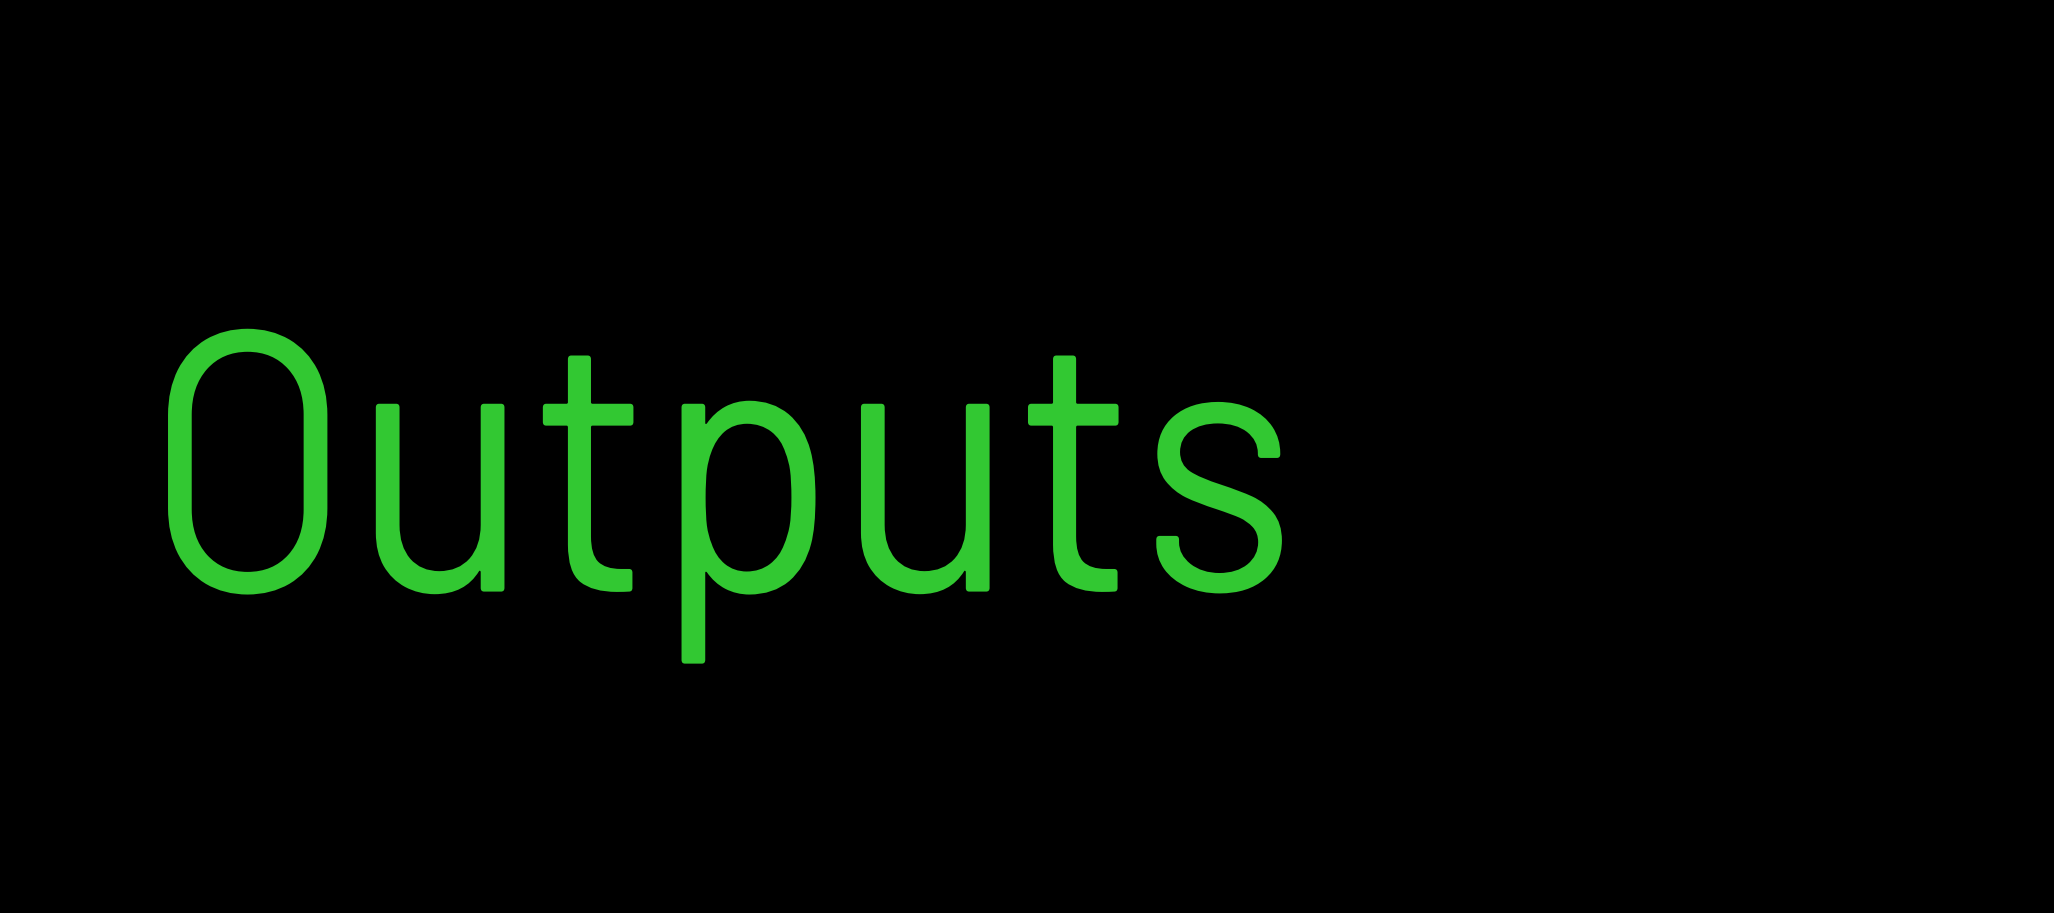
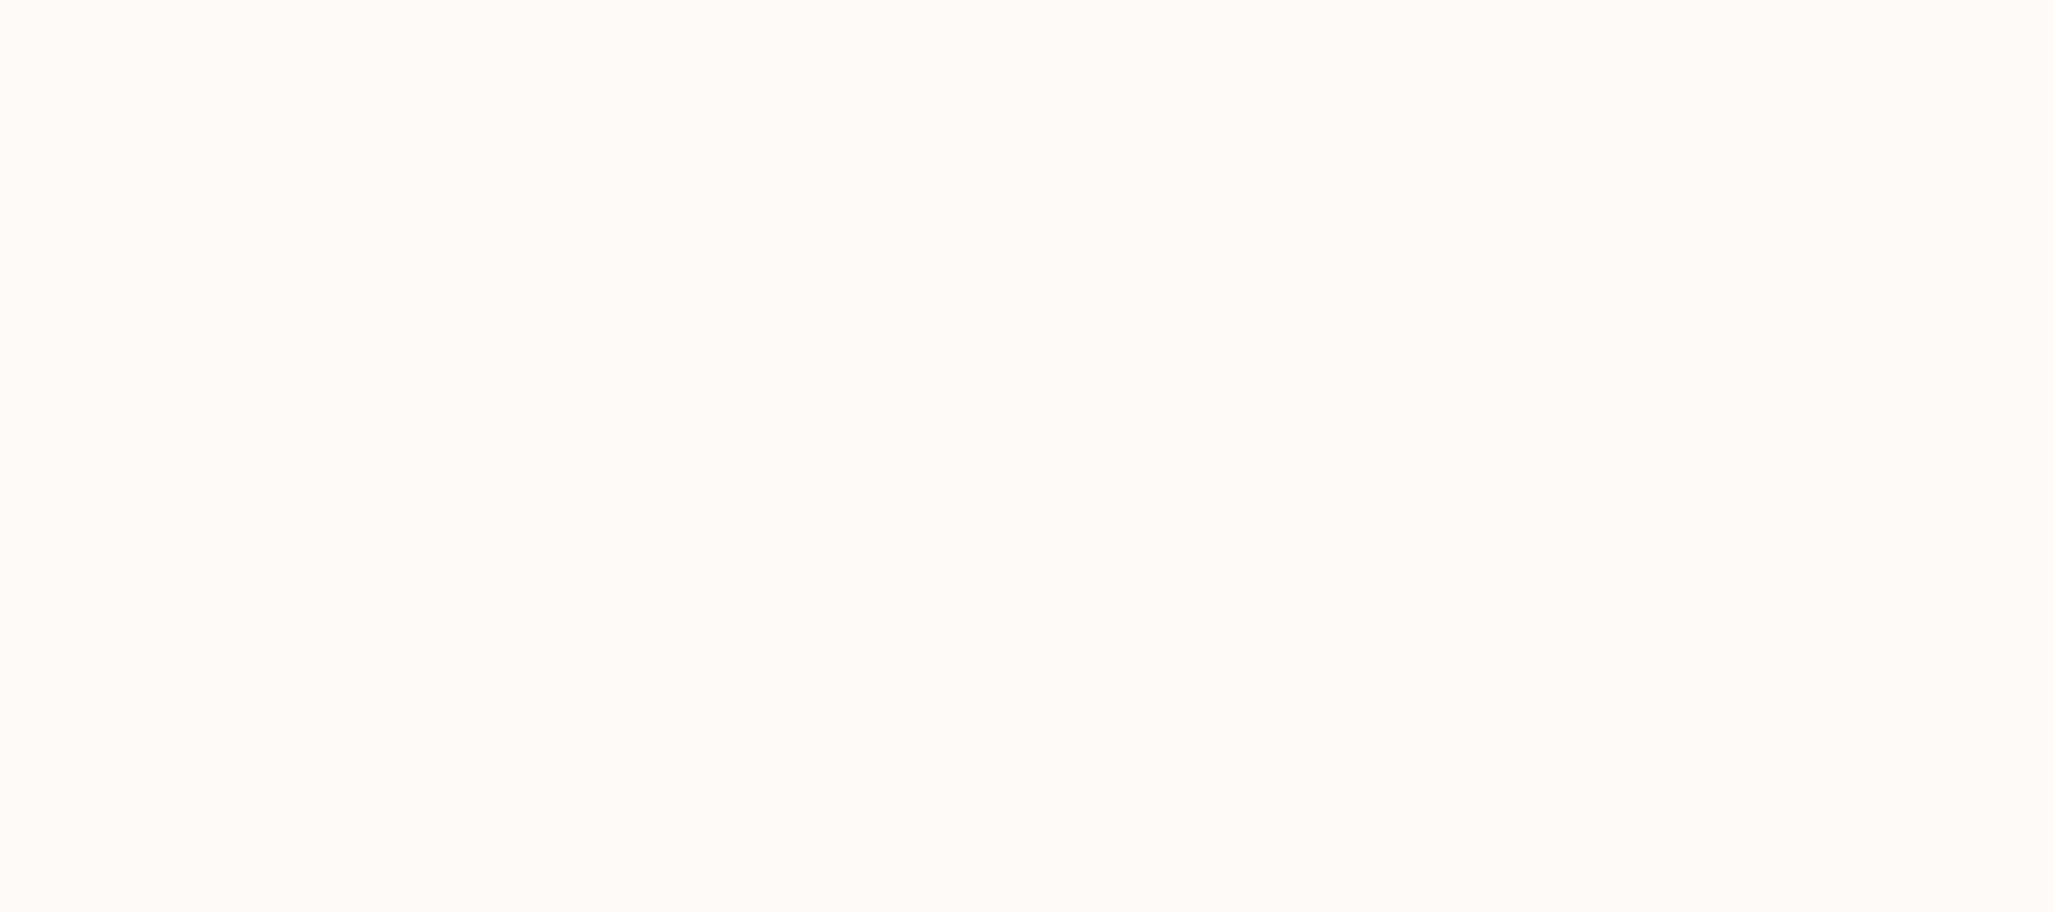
text: Outputs (724, 496) -> none

